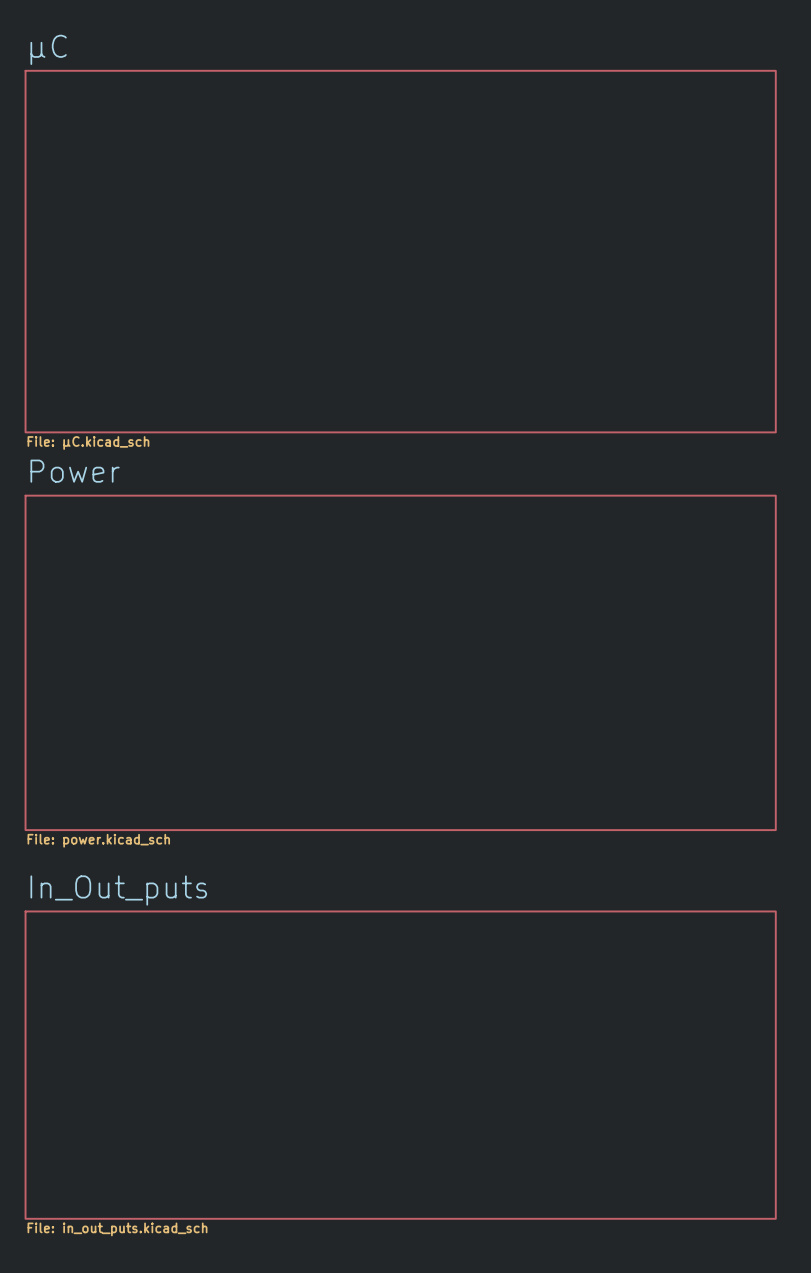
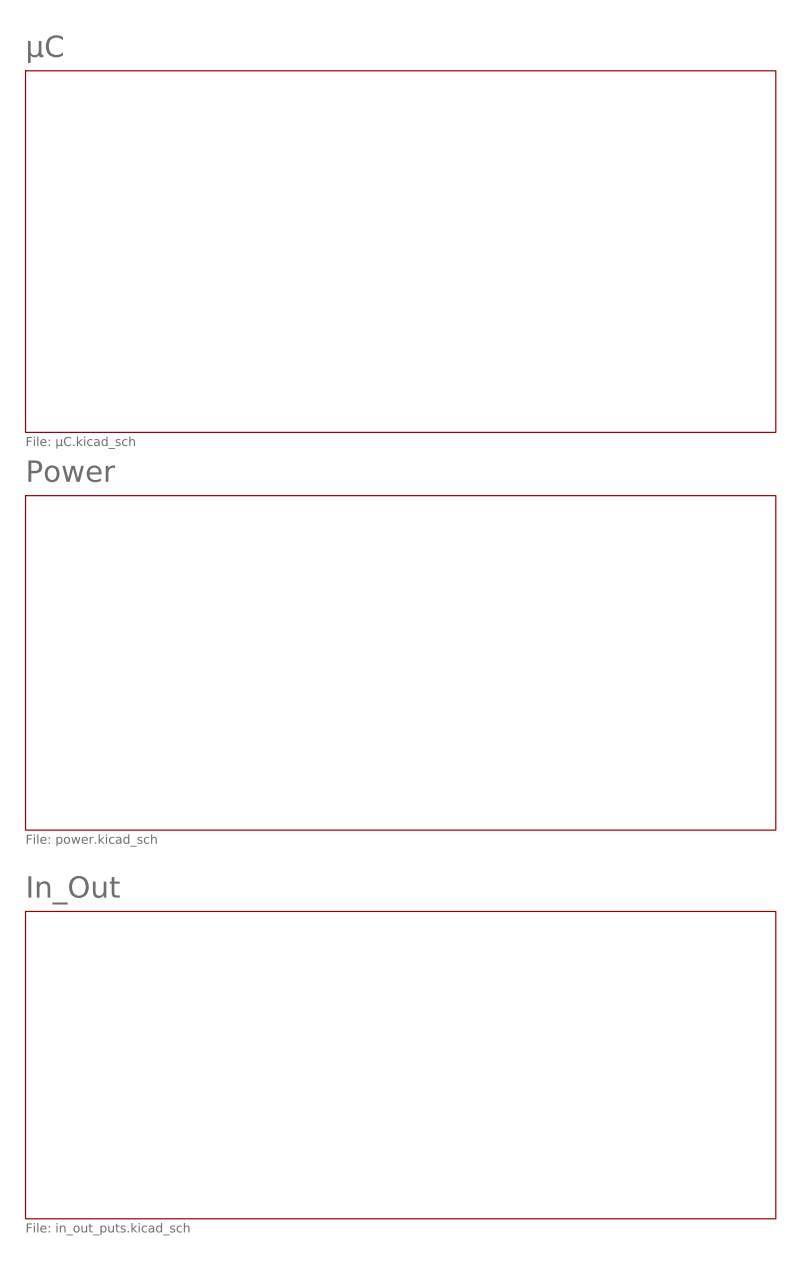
sheet In_Out_puts name: In_Out_puts (118, 890) -> In_Out (74, 890)

